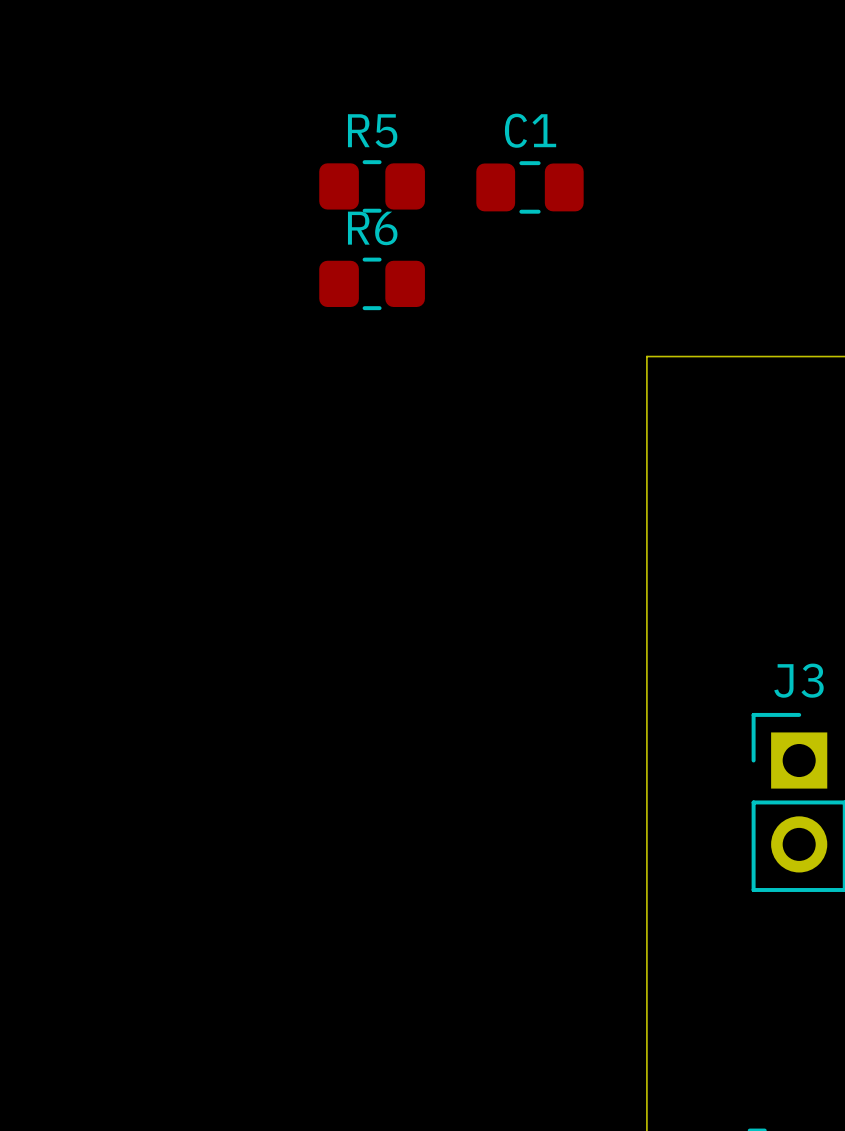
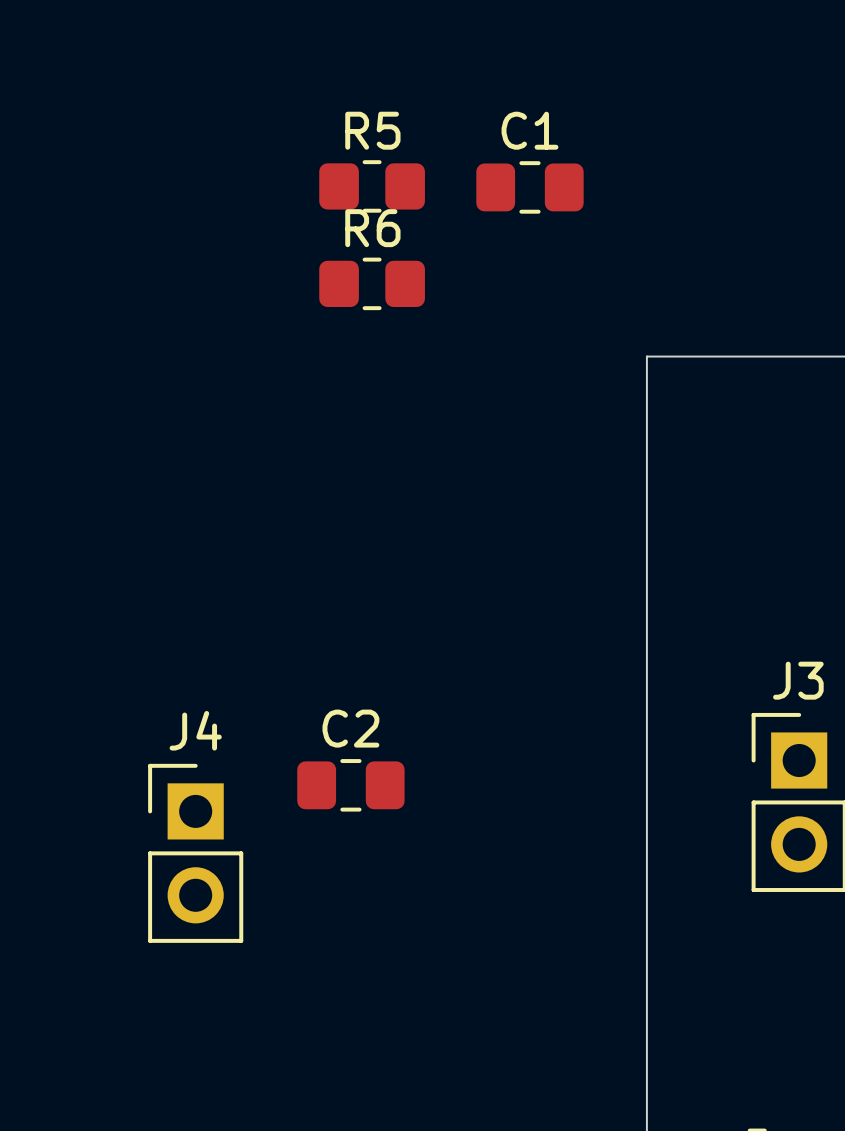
C2: none -> (350, 785)
J4: none -> (195, 853)

